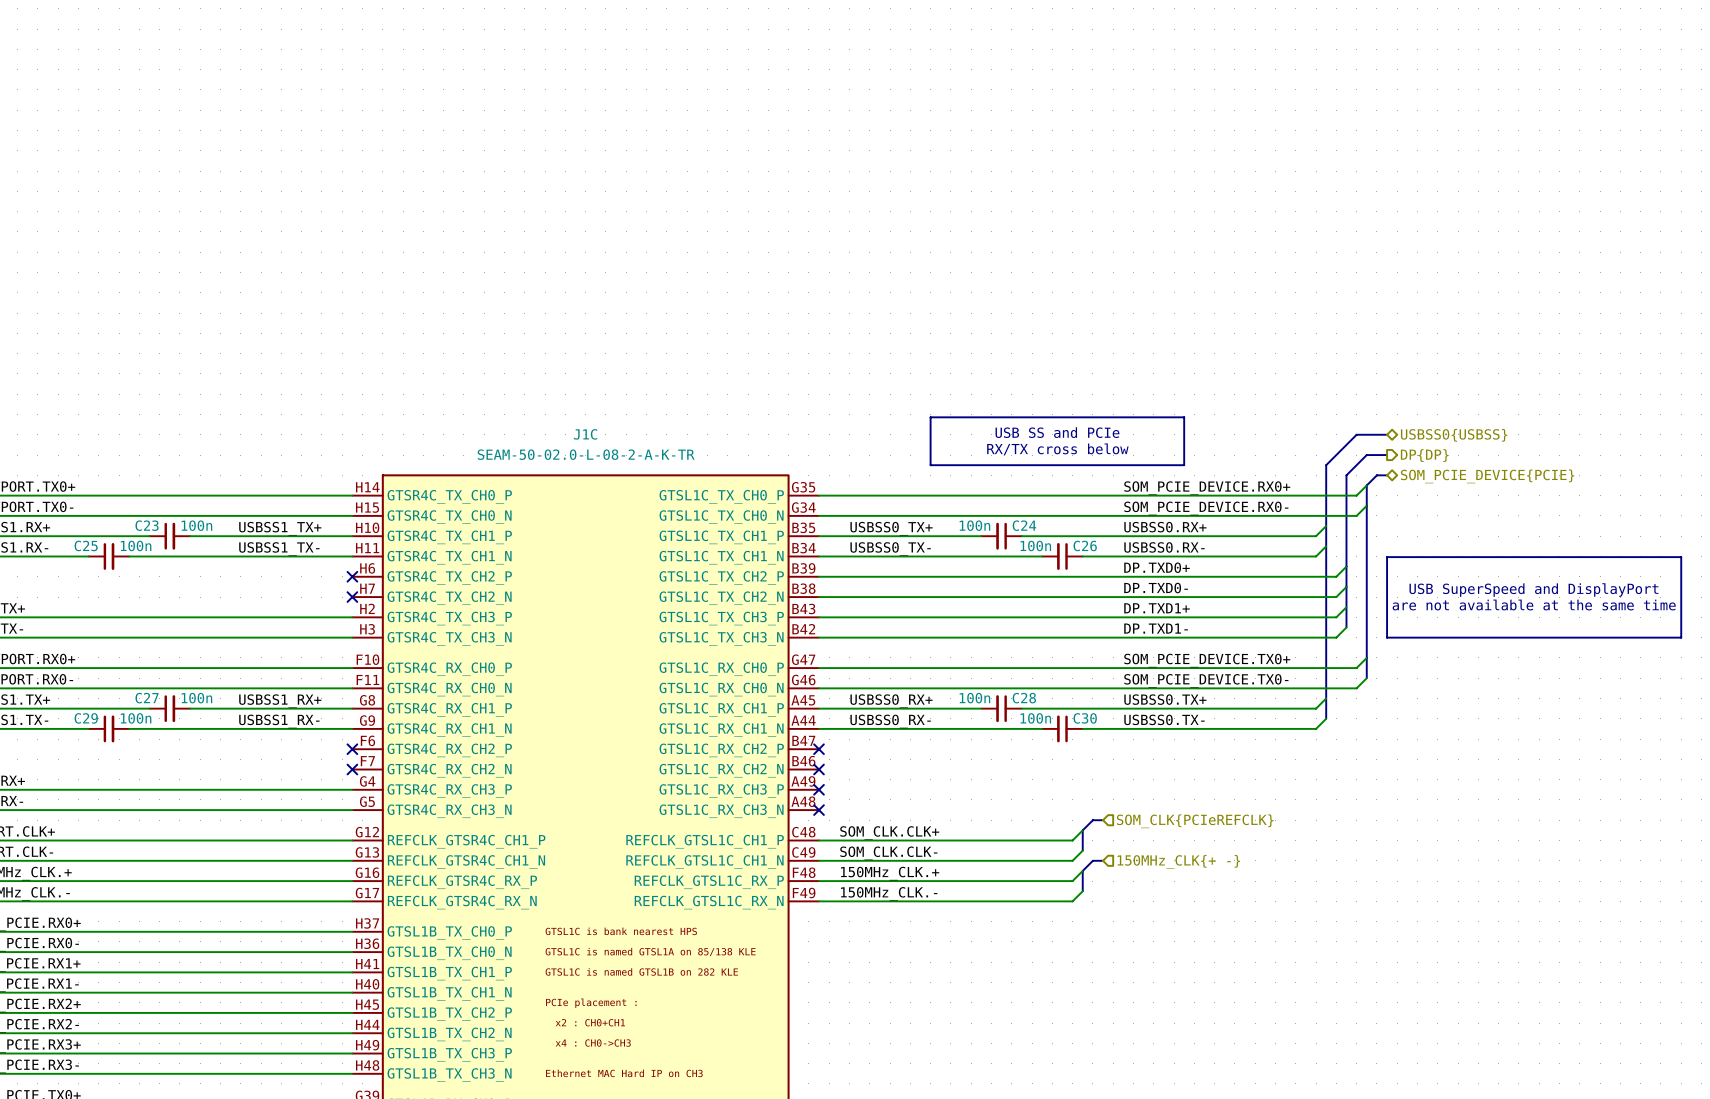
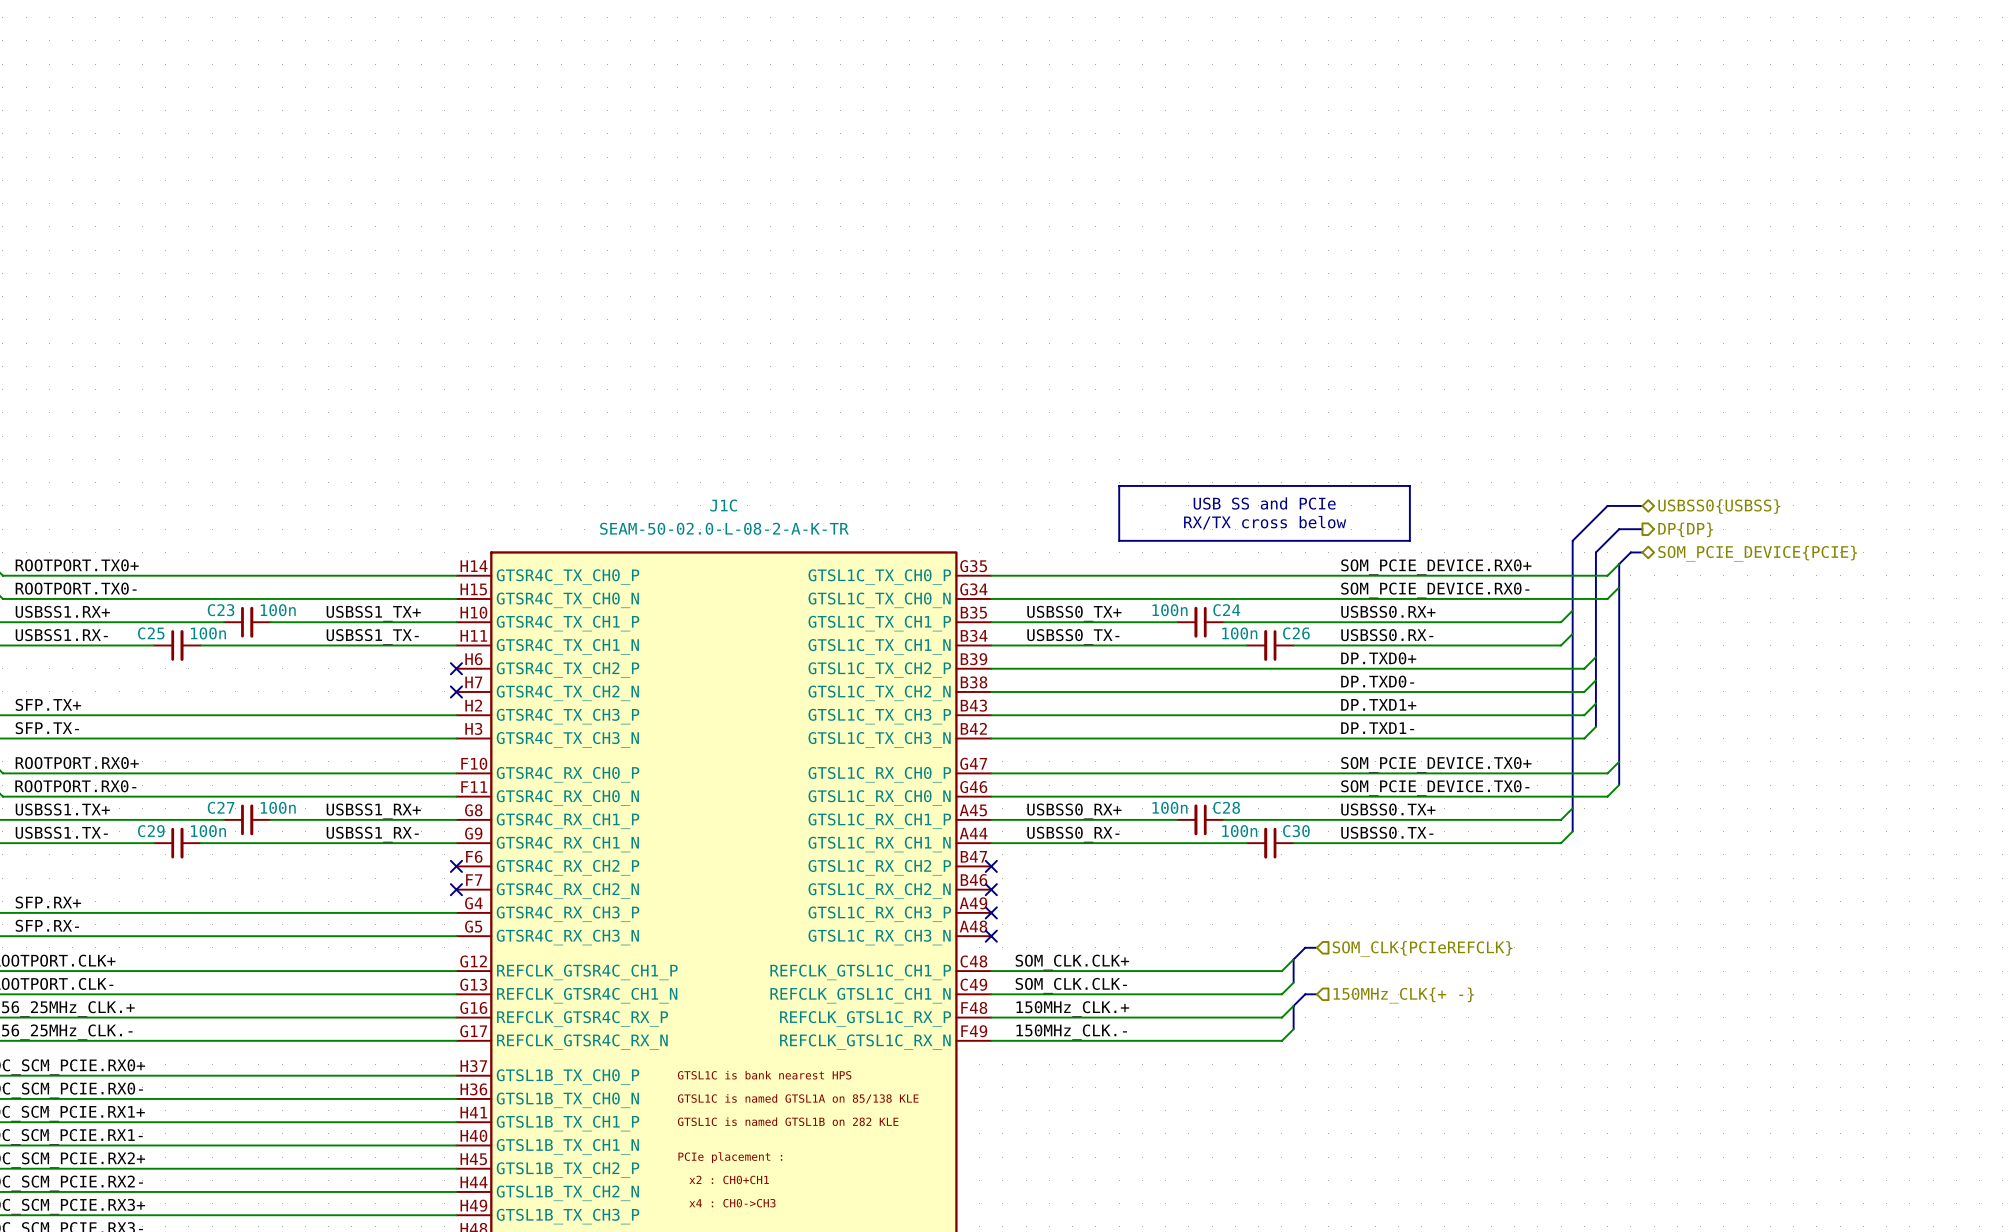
line: (1387, 557) (1681, 557) (1681, 637) (1387, 637) (1387, 557) -> none
text: USB SuperSpeed and DisplayPort (1533, 590) -> none
text: are not available at the same time (1534, 605) -> none

